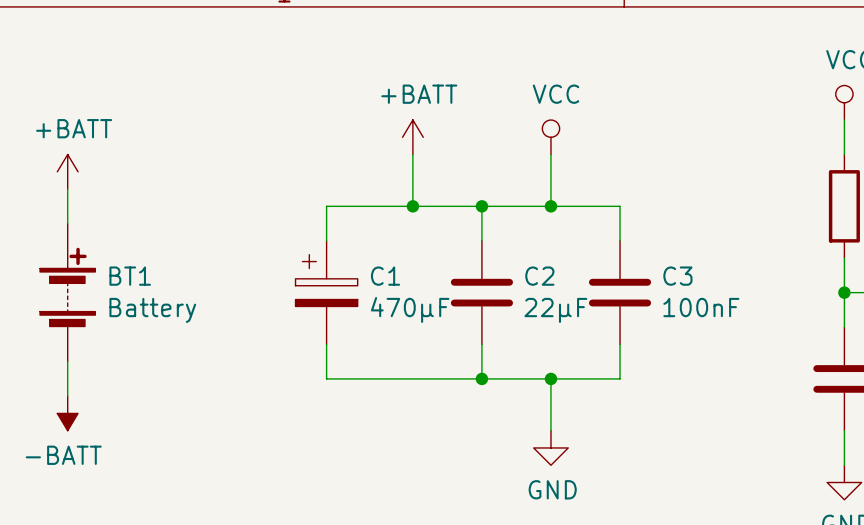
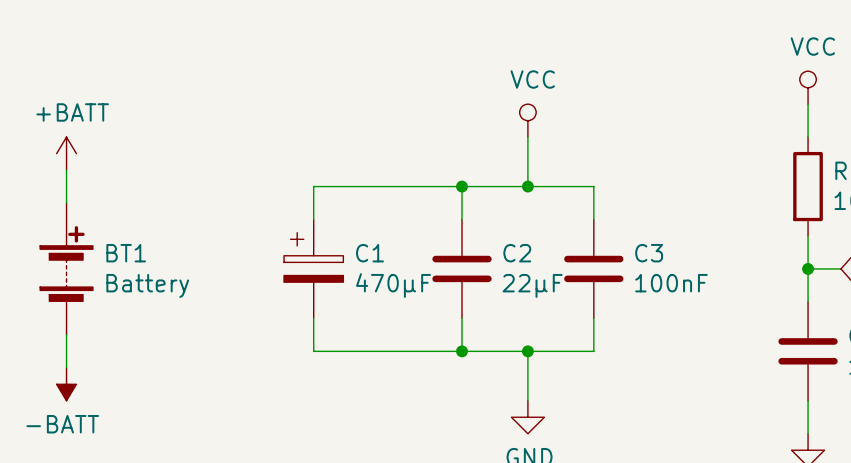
power symbol: +BATT (412, 137) -> none
wire: (412, 154) (412, 206) -> none
junction: (412, 206) -> none

